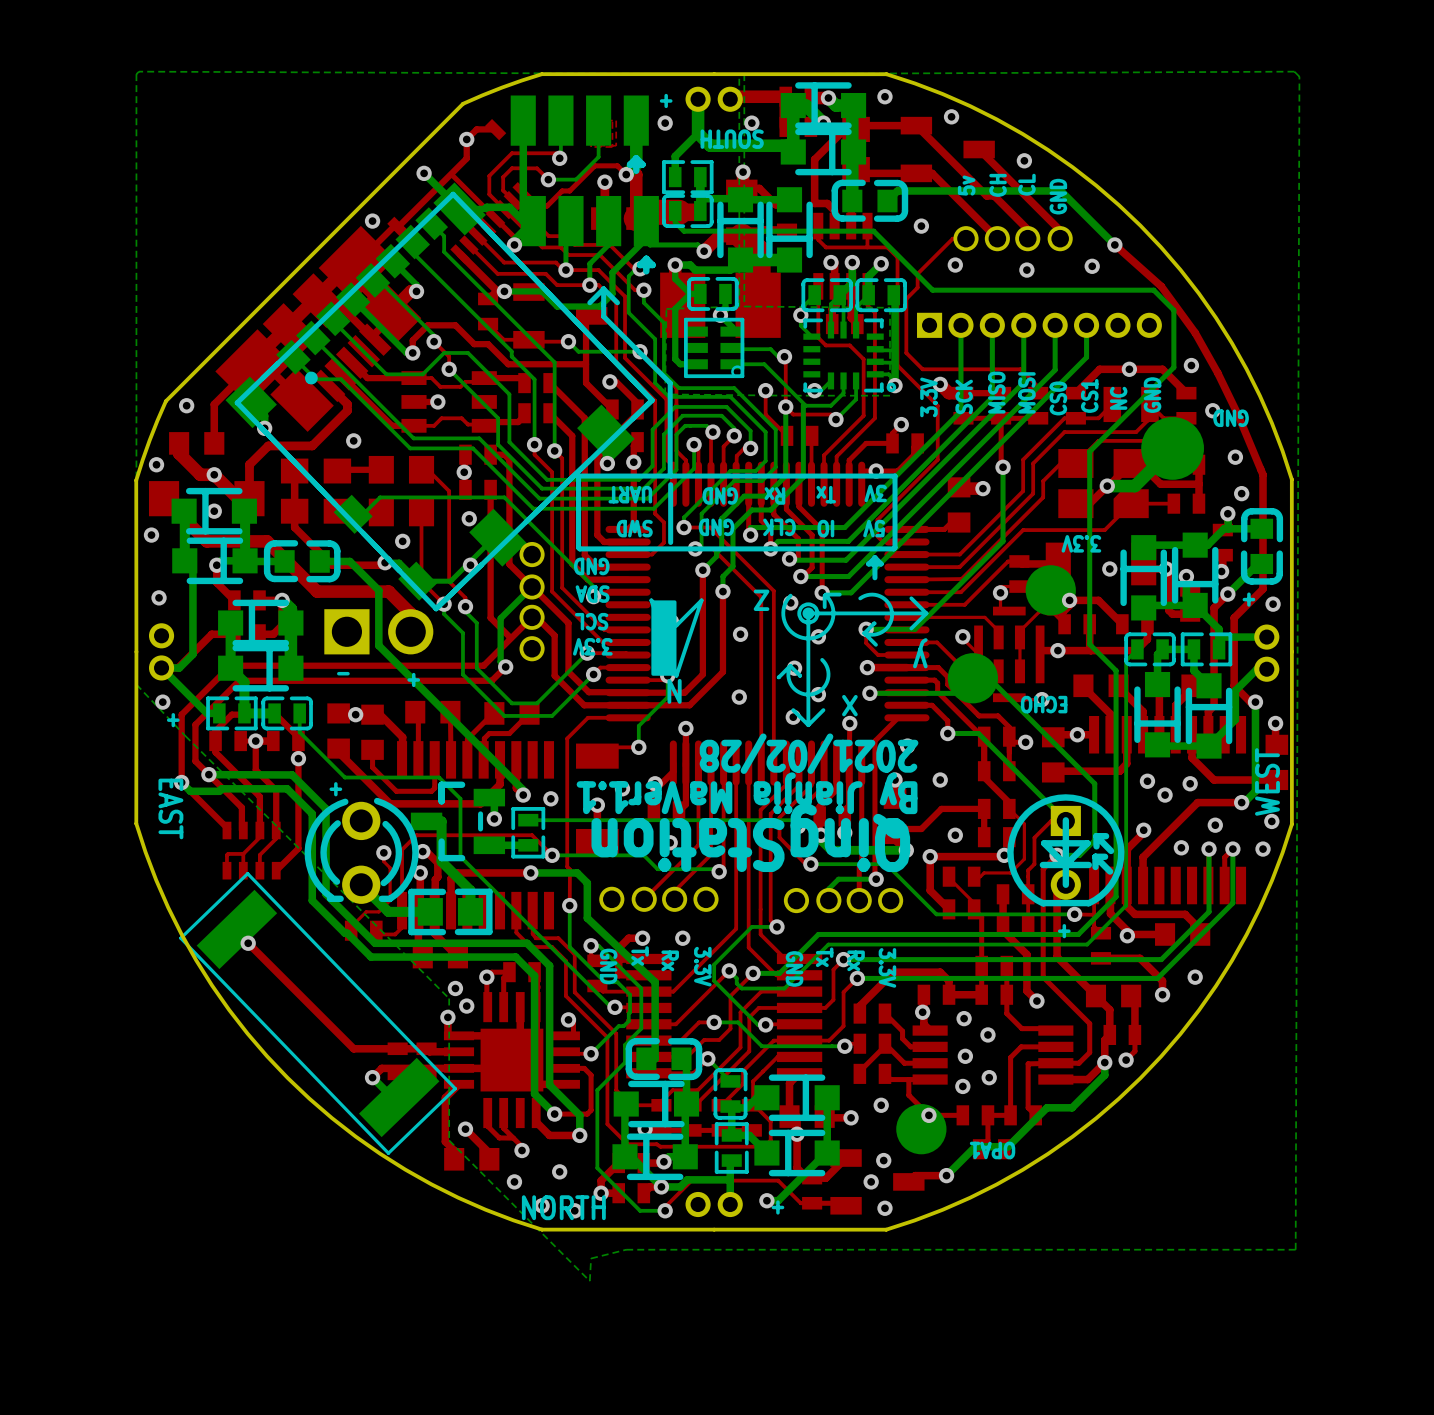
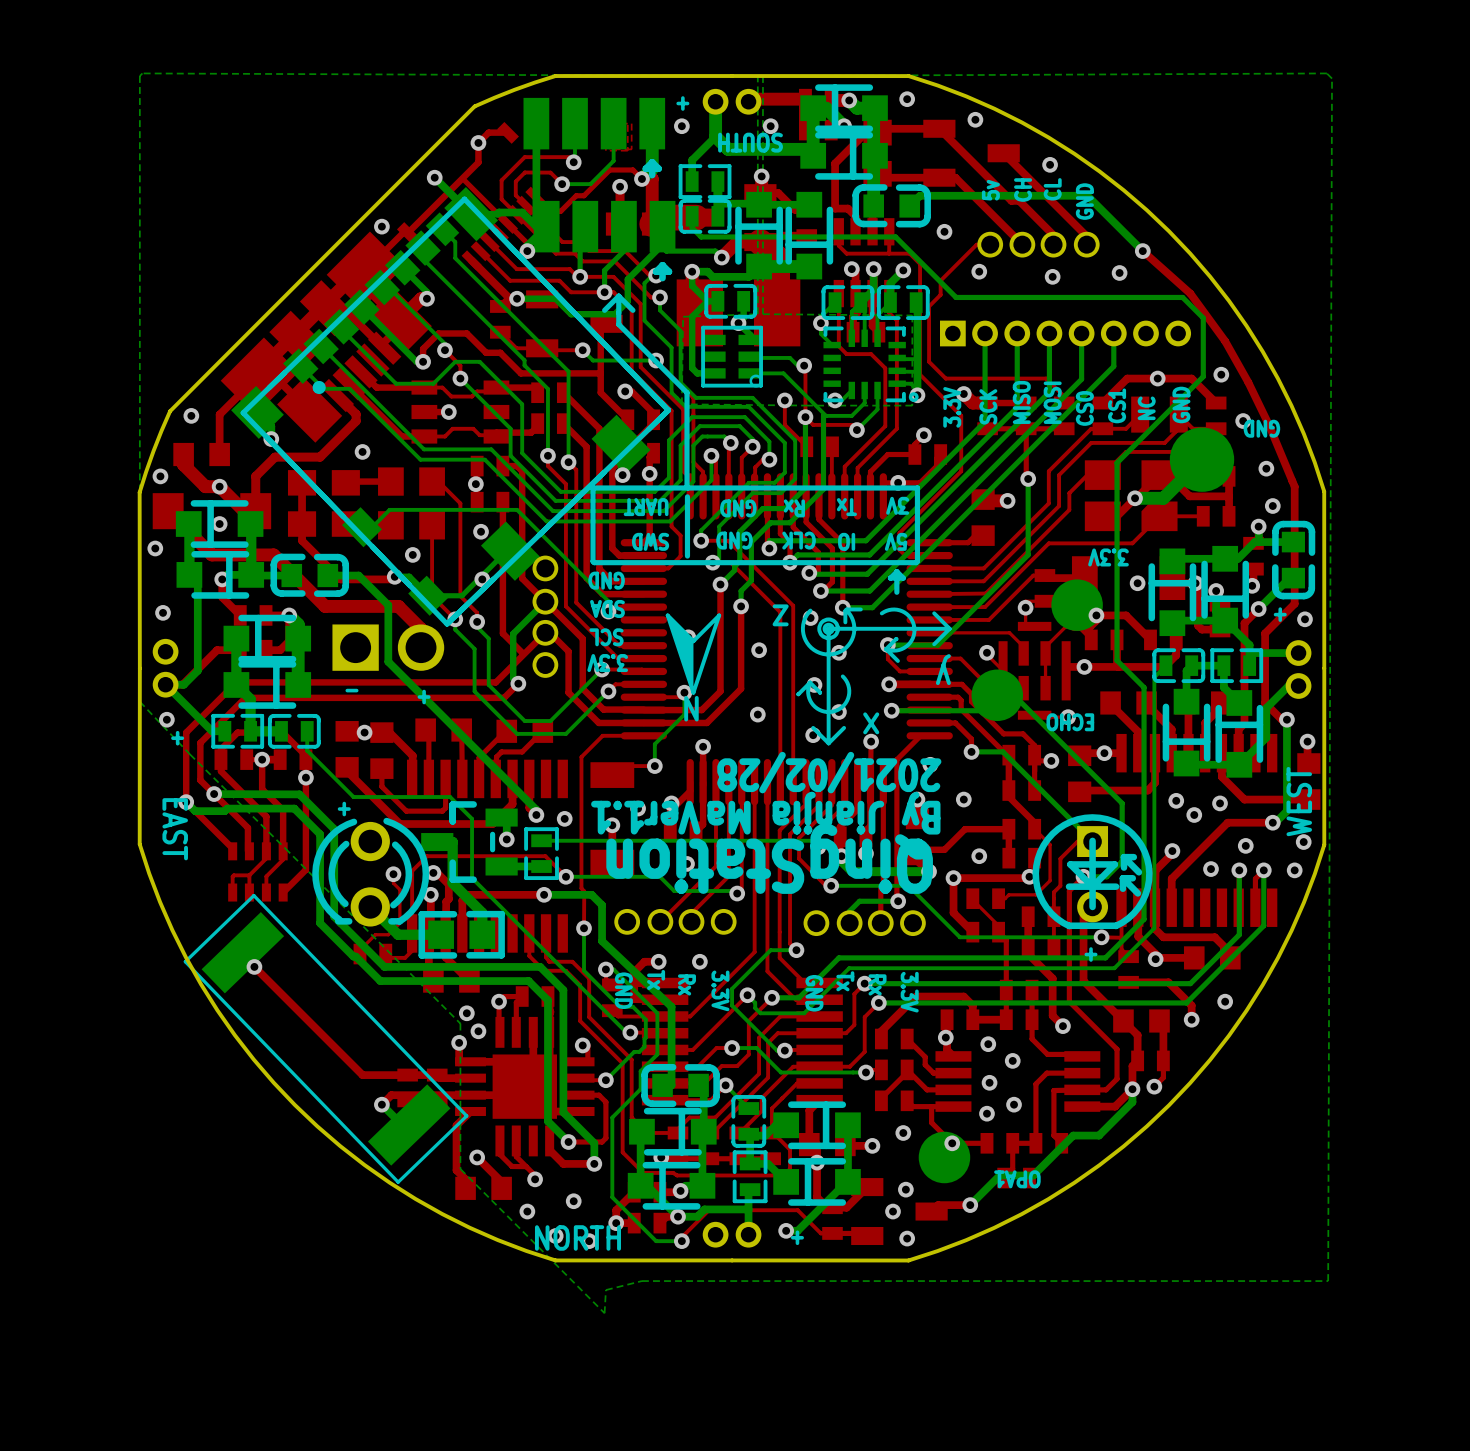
drawing shape: [651, 600, 677, 676] -> [667, 615, 694, 693]

